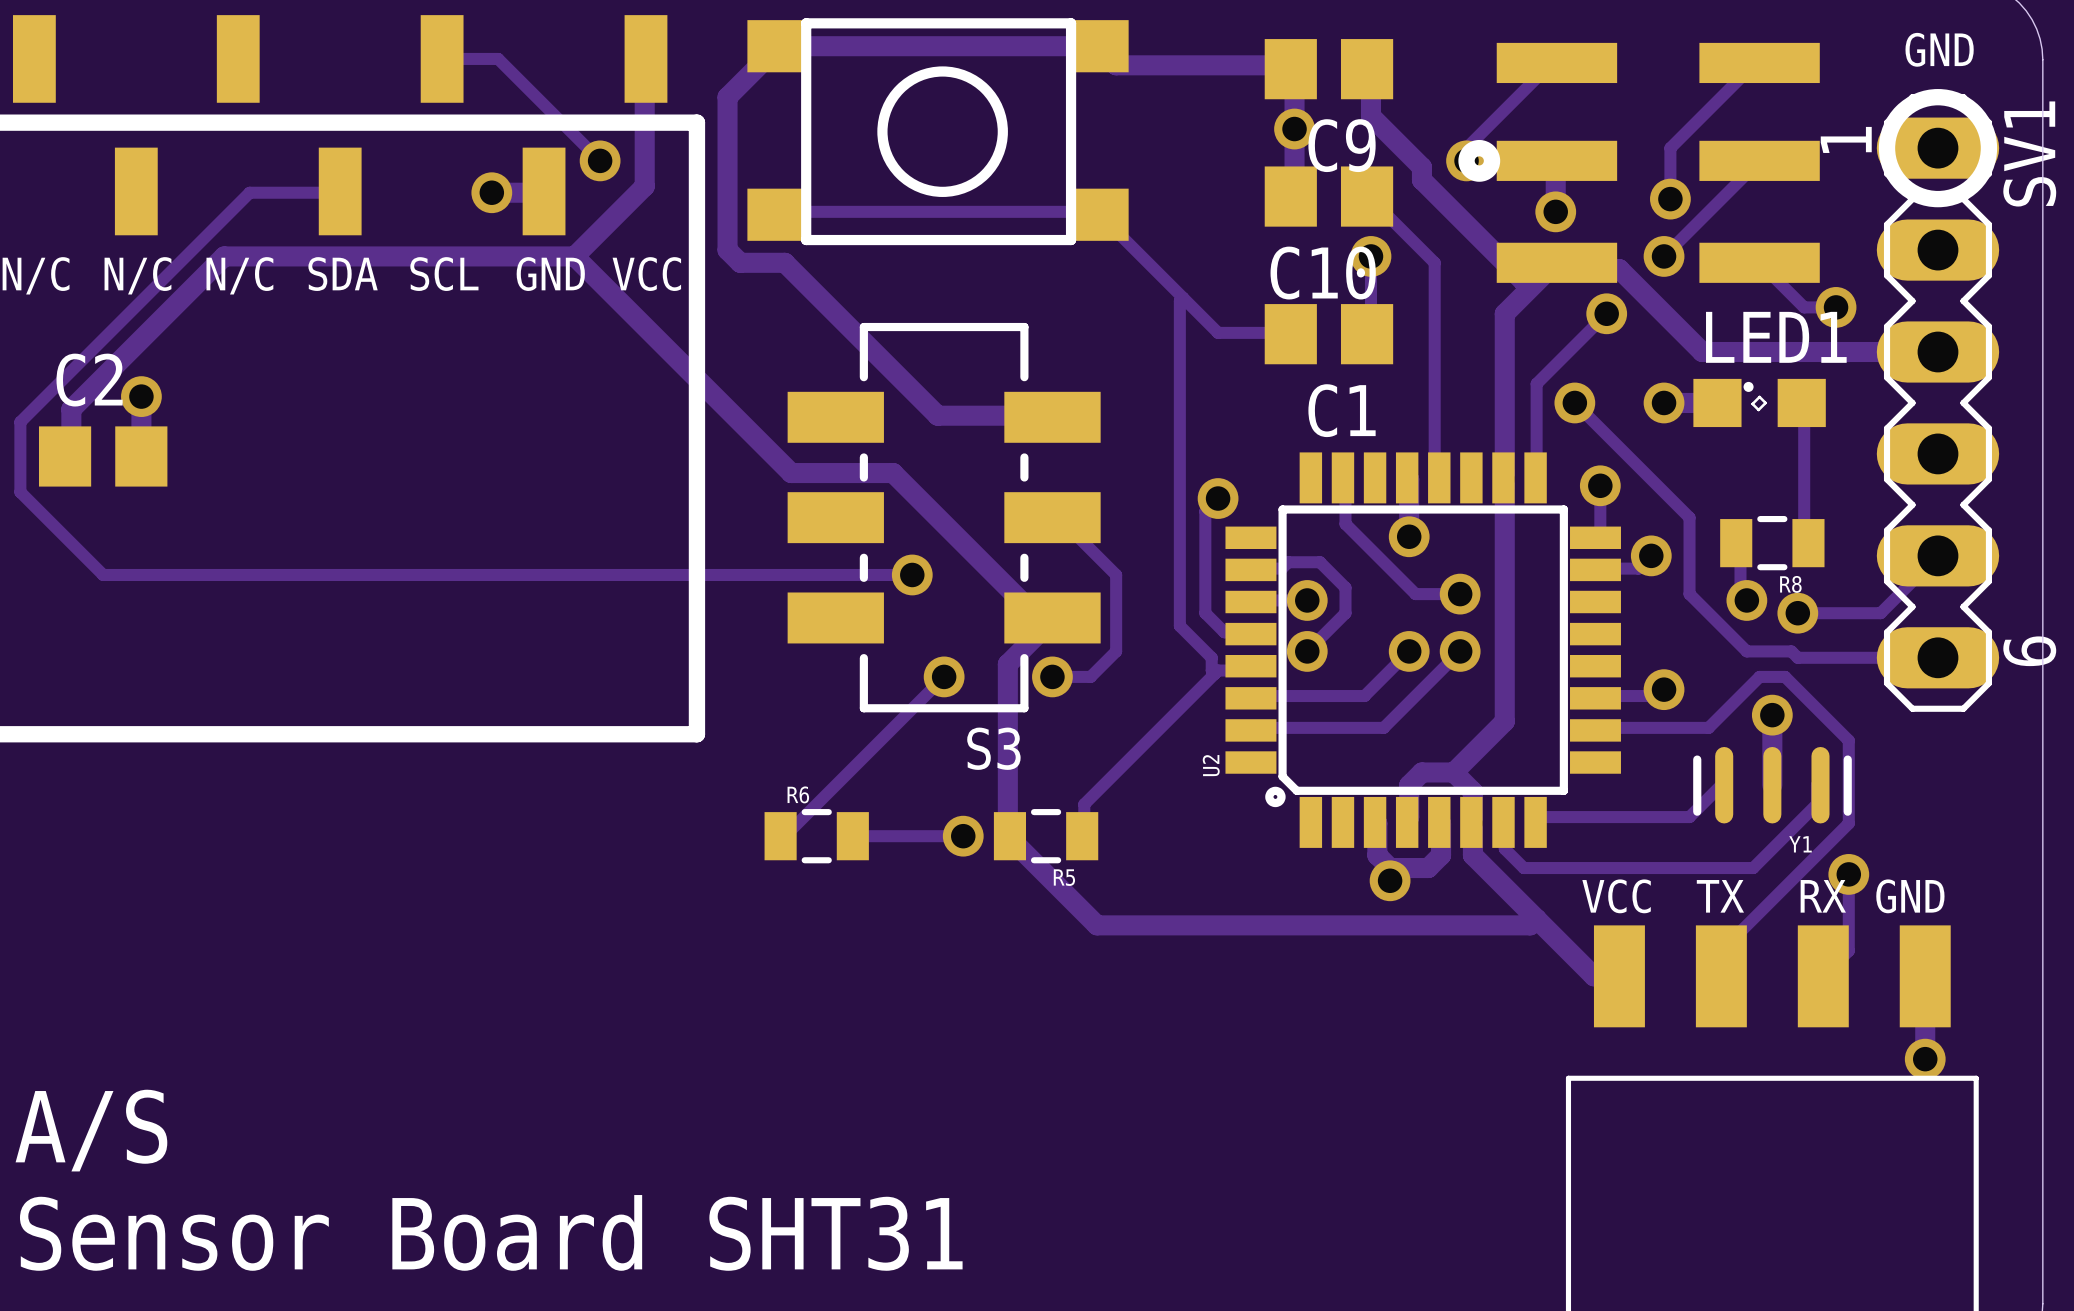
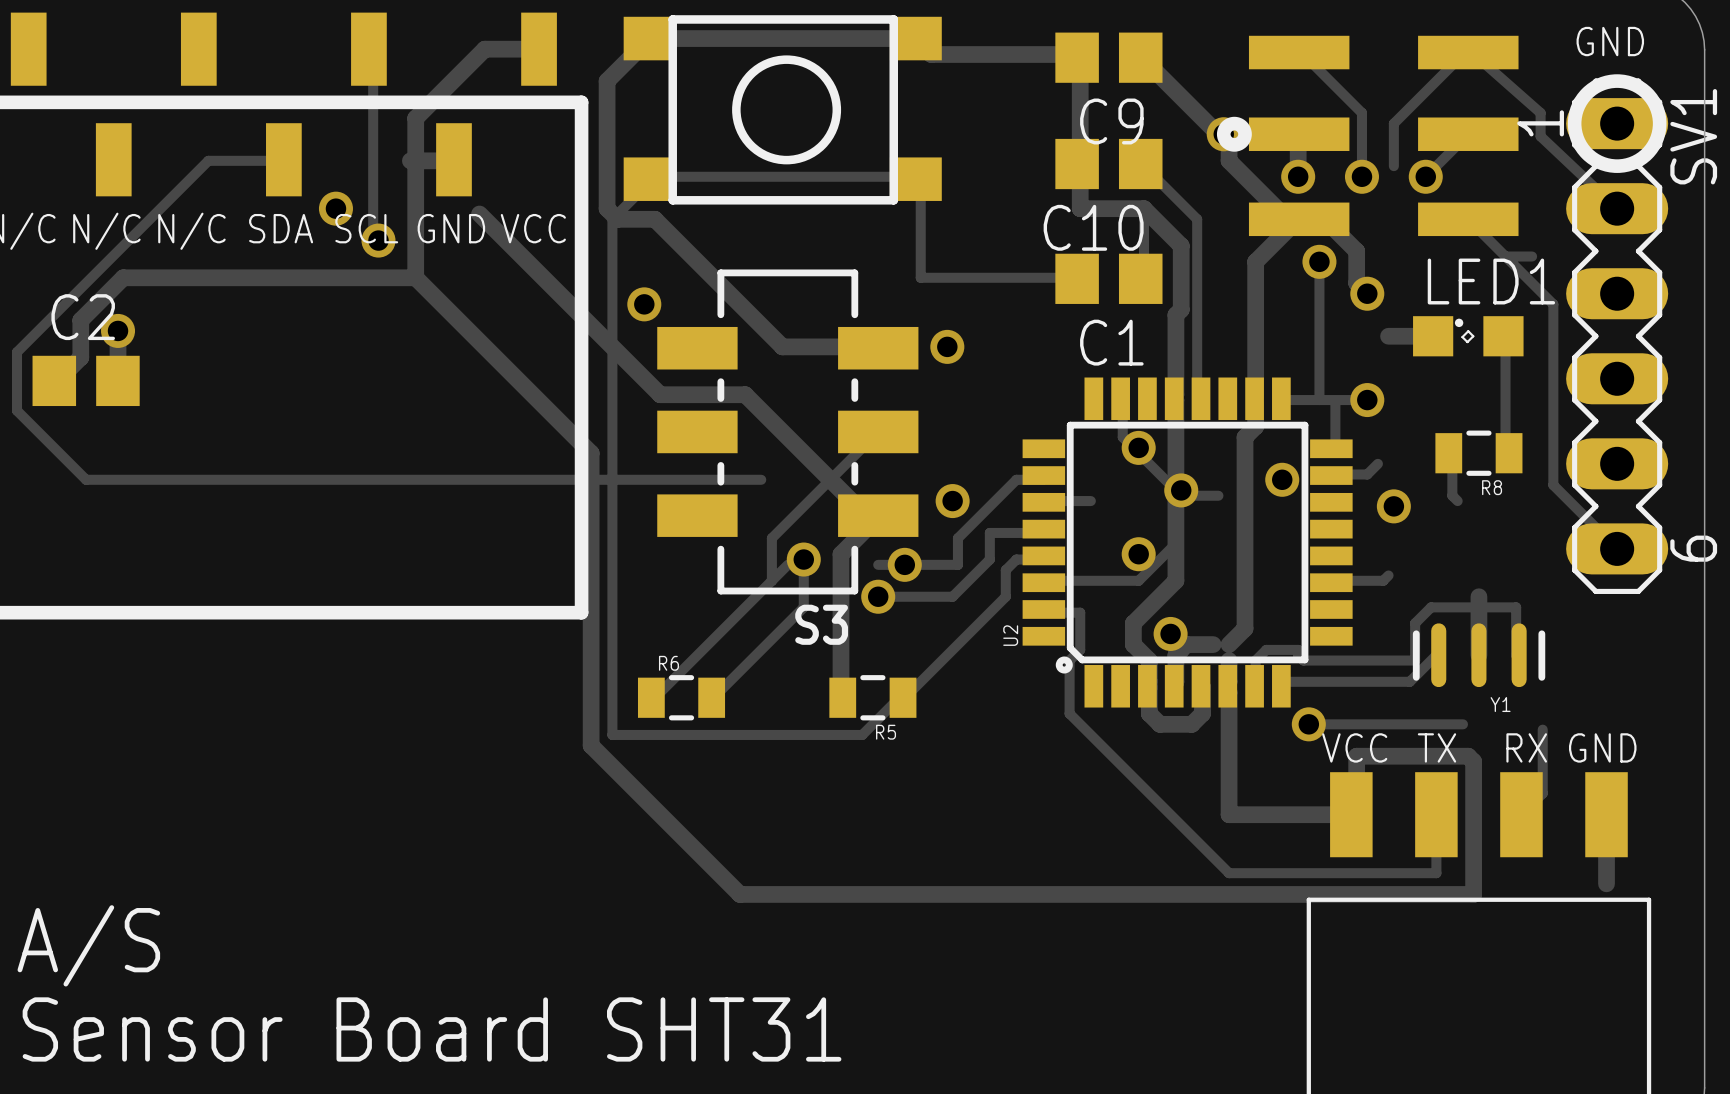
track: (447, 58) (498, 58) (600, 160) -> (373, 49) (373, 235) (378, 240)
track: (644, 58) (644, 186) (574, 256) (224, 256) (147, 332) -> (415, 277) (123, 277)
track: none -> (537, 49) (484, 49) (415, 118) (415, 277)
track: none -> (1468, 49) (1540, 112) (1540, 136) (1617, 208)
track: (1556, 62) (1555, 58) (1466, 148) (1466, 160) -> (1299, 52) (1303, 54) (1361, 112) (1361, 176)
track: (1370, 71) (1370, 116) (1421, 167) (1421, 179) (1523, 281) (1556, 262) -> (1144, 59) (1229, 144) (1229, 160) (1287, 219) (1298, 219)
via: (1294, 129) -> none
via: (600, 160) -> none
via: (491, 192) -> none
track: none -> (1077, 164) (1080, 171) (1080, 208) (1144, 208) (1181, 245) (1181, 309) (1175, 314) (1175, 394) (1174, 398)
via: (1670, 199) -> none
via: none -> (1361, 176)
track: (1708, 211) (1664, 256) -> none
via: none -> (1425, 176)
track: none -> (649, 179) (649, 182) (612, 219) (612, 734) (862, 734) (899, 697) (903, 697)
track: (1103, 218) (1218, 332) -> (920, 182) (920, 277) (1016, 277)
via: none -> (335, 208)
via: (1370, 256) -> none
via: (1664, 256) -> none
track: (1593, 269) (1619, 269) (1702, 352) (1937, 352) -> (1330, 224) (1356, 251) (1356, 283) (1367, 293)
via: none -> (378, 240)
track: (1183, 297) (1179, 301) (1179, 625) (1211, 657) (1211, 670) (1214, 673) -> none
via: (1836, 307) -> none
track: none -> (1319, 261) (1319, 400)
via: none -> (1319, 261)
track: (1606, 313) (1536, 383) (1535, 477) -> (1367, 400) (1281, 398)
via: (1606, 313) -> none
track: none -> (415, 277) (591, 453) (591, 745) (739, 894) (1473, 894) (1473, 761) (1468, 756) (1356, 756) (1356, 809) (1351, 814)
via: none -> (1367, 293)
via: none -> (644, 304)
track: (96, 383) (71, 409) (71, 453) -> (80, 320) (80, 357) (59, 378)
track: (1574, 402) (1689, 517) (1689, 594) (1746, 651) (1791, 651) (1797, 657) (1937, 657) -> (1505, 256) (1553, 304) (1553, 485) (1617, 548)
via: (1574, 402) -> none
via: (1664, 402) -> none
via: none -> (947, 346)
via position: (1600, 485) -> (1367, 400)
track: (1218, 498) (1205, 511) (1205, 613) (1224, 632) (1249, 632) (1250, 634) -> (878, 596) (952, 596) (989, 559) (989, 532) (1043, 532) (1043, 529)
via: (1218, 498) -> none
track: (1504, 511) (1504, 721) (1453, 772) (1472, 791) -> (1255, 426) (1245, 437) (1245, 628) (1229, 644)
track: (1052, 517) (1058, 517) (1116, 574) (1116, 651) (1090, 676) -> (878, 431) (771, 538) (771, 580)
via: none -> (1138, 447)
track: none -> (1175, 447) (1175, 580) (1133, 623) (1133, 644) (1149, 660) (1149, 681) (1147, 686)
via: (1409, 536) -> none
via: (1651, 555) -> none
track: (1937, 555) (1880, 613) (1797, 613) -> none
track: (1250, 569) (1281, 568) (1288, 562) (1320, 562) (1345, 587) (1345, 613) (1307, 651) -> (1043, 475) (1043, 479) (1016, 479) (957, 538) (957, 564) (910, 564)
via: (912, 574) -> none
via: none -> (1282, 479)
via: none -> (1181, 490)
via: (1460, 594) -> none
via: none -> (952, 501)
via: (1307, 600) -> none
via: (1746, 600) -> none
via: none -> (1393, 506)
via: (1797, 613) -> none
via: (1307, 651) -> none
via: (1409, 651) -> none
track: (1460, 651) (1383, 727) (1256, 727) (1250, 730) -> none
via: (1460, 651) -> none
via: none -> (1138, 554)
via position: (944, 676) -> (803, 559)
via: (1052, 676) -> none
via: none -> (904, 564)
track: (1205, 683) (1084, 804) (1084, 836) -> (1005, 570) (1005, 596) (904, 697)
via: (1664, 689) -> none
via: none -> (878, 596)
via: (1772, 715) -> none
track: (1595, 730) (1600, 727) (1708, 727) (1759, 676) (1785, 676) (1848, 740) (1848, 823) (1721, 950) (1721, 976) -> (1043, 609) (1048, 612) (1080, 612) (1080, 649) (1069, 660) (1069, 713) (1229, 873) (1436, 873) (1436, 814)
via: none -> (1170, 633)
track: (1816, 785) (1816, 804) (1753, 868) -> (1516, 655) (1516, 607) (1431, 607) (1415, 623) (1415, 660) (1303, 660) (1298, 655) (1298, 649) (1266, 649) (1255, 660) (1254, 686)
track: (1503, 822) (1504, 848) (1523, 868) (1568, 868) -> none
track: (854, 836) (963, 836) -> (713, 697) (803, 607) (803, 559)
via: (963, 836) -> none
track: (1009, 836) (1097, 925) (1530, 925) (1536, 919) -> none
track: (1472, 855) (1593, 976) -> (1229, 713) (1229, 814) (1330, 814)
via: none -> (1308, 724)
via: (1848, 874) -> none
via: (1390, 880) -> none
via: (1925, 1059) -> none

